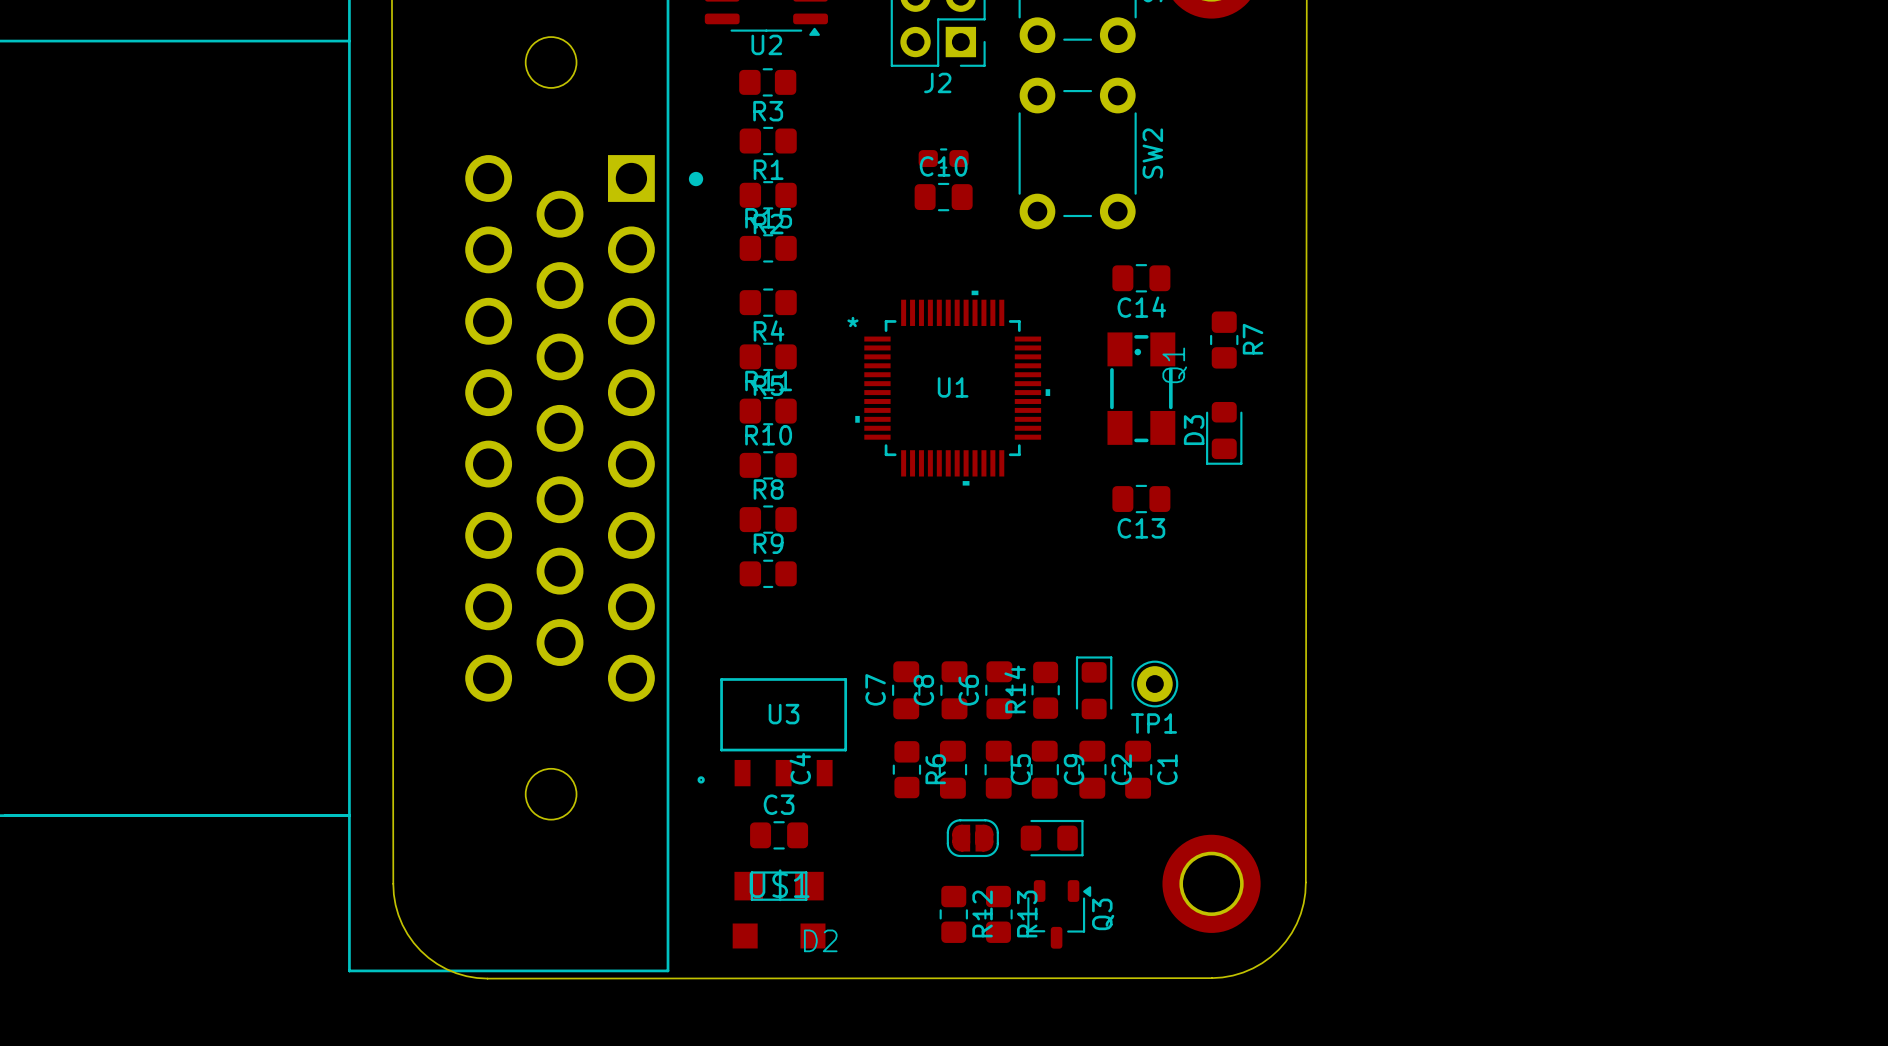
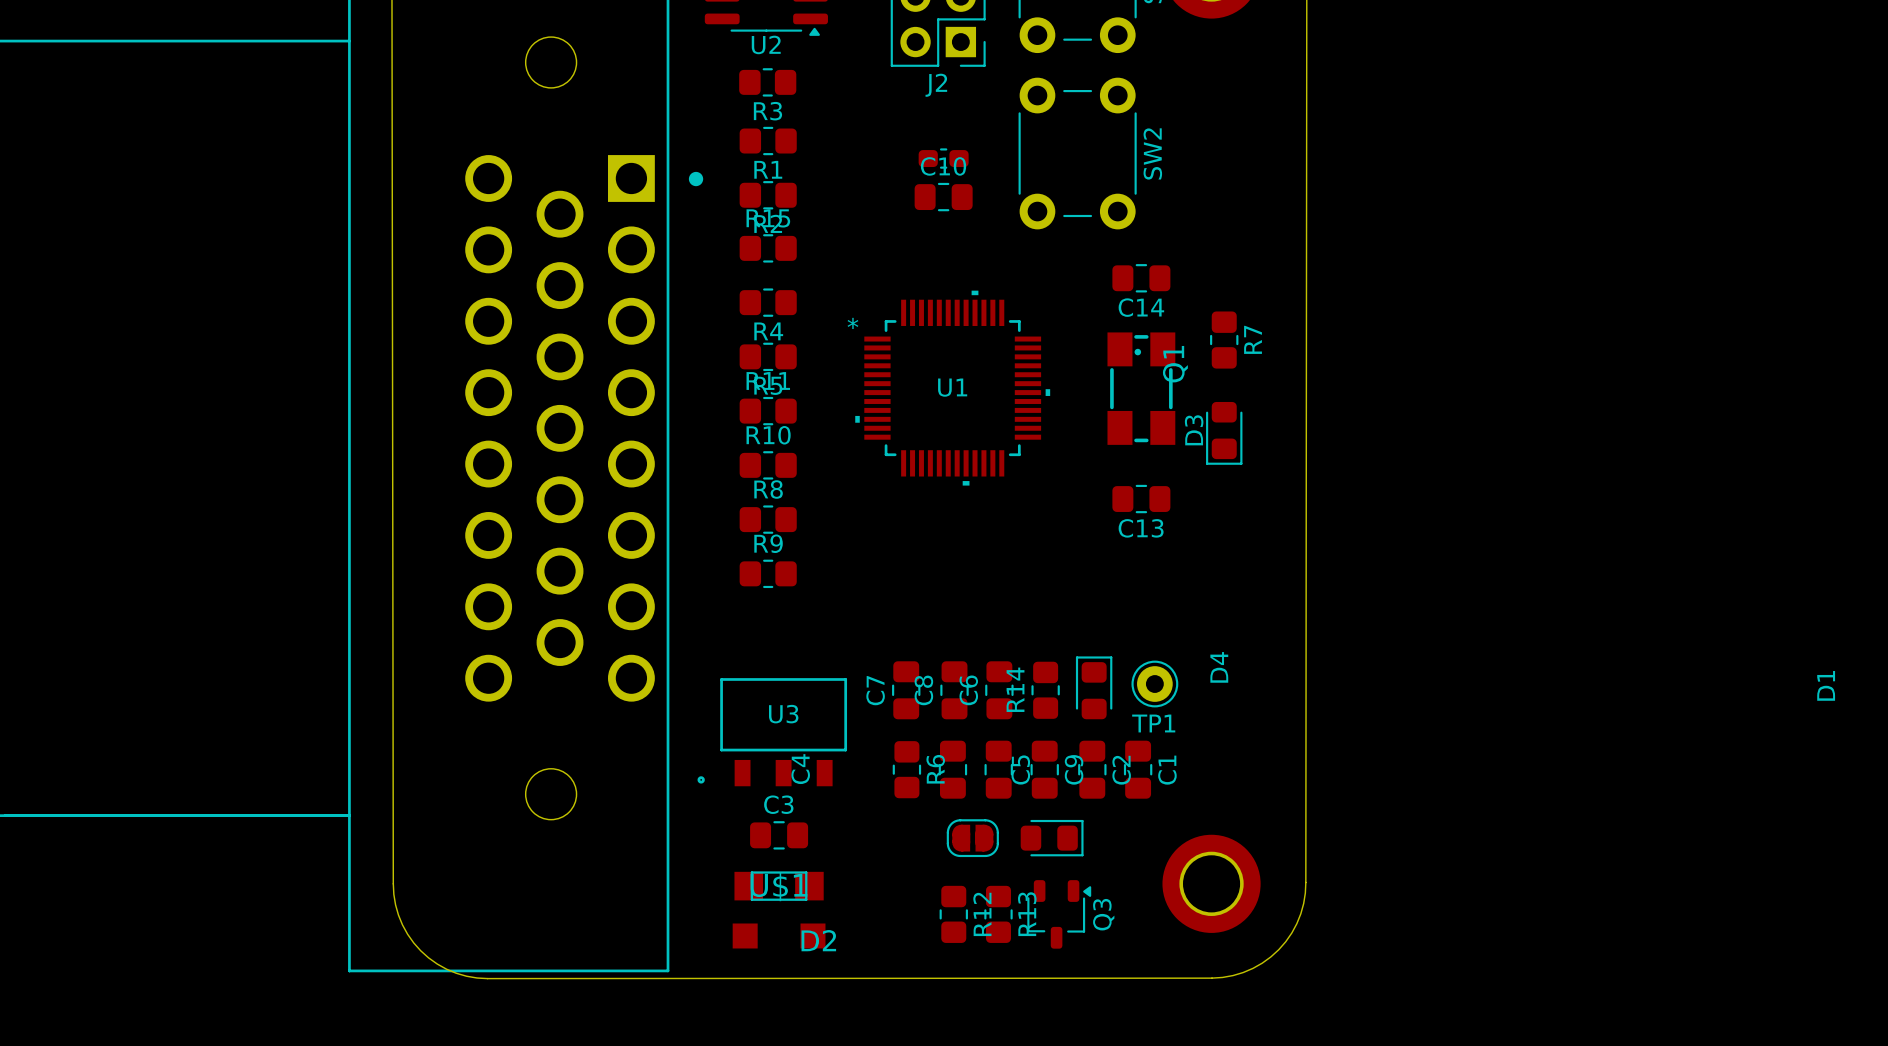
D4 name: none -> D4 (1219, 667)
D1 name: none -> D1 (1826, 685)

